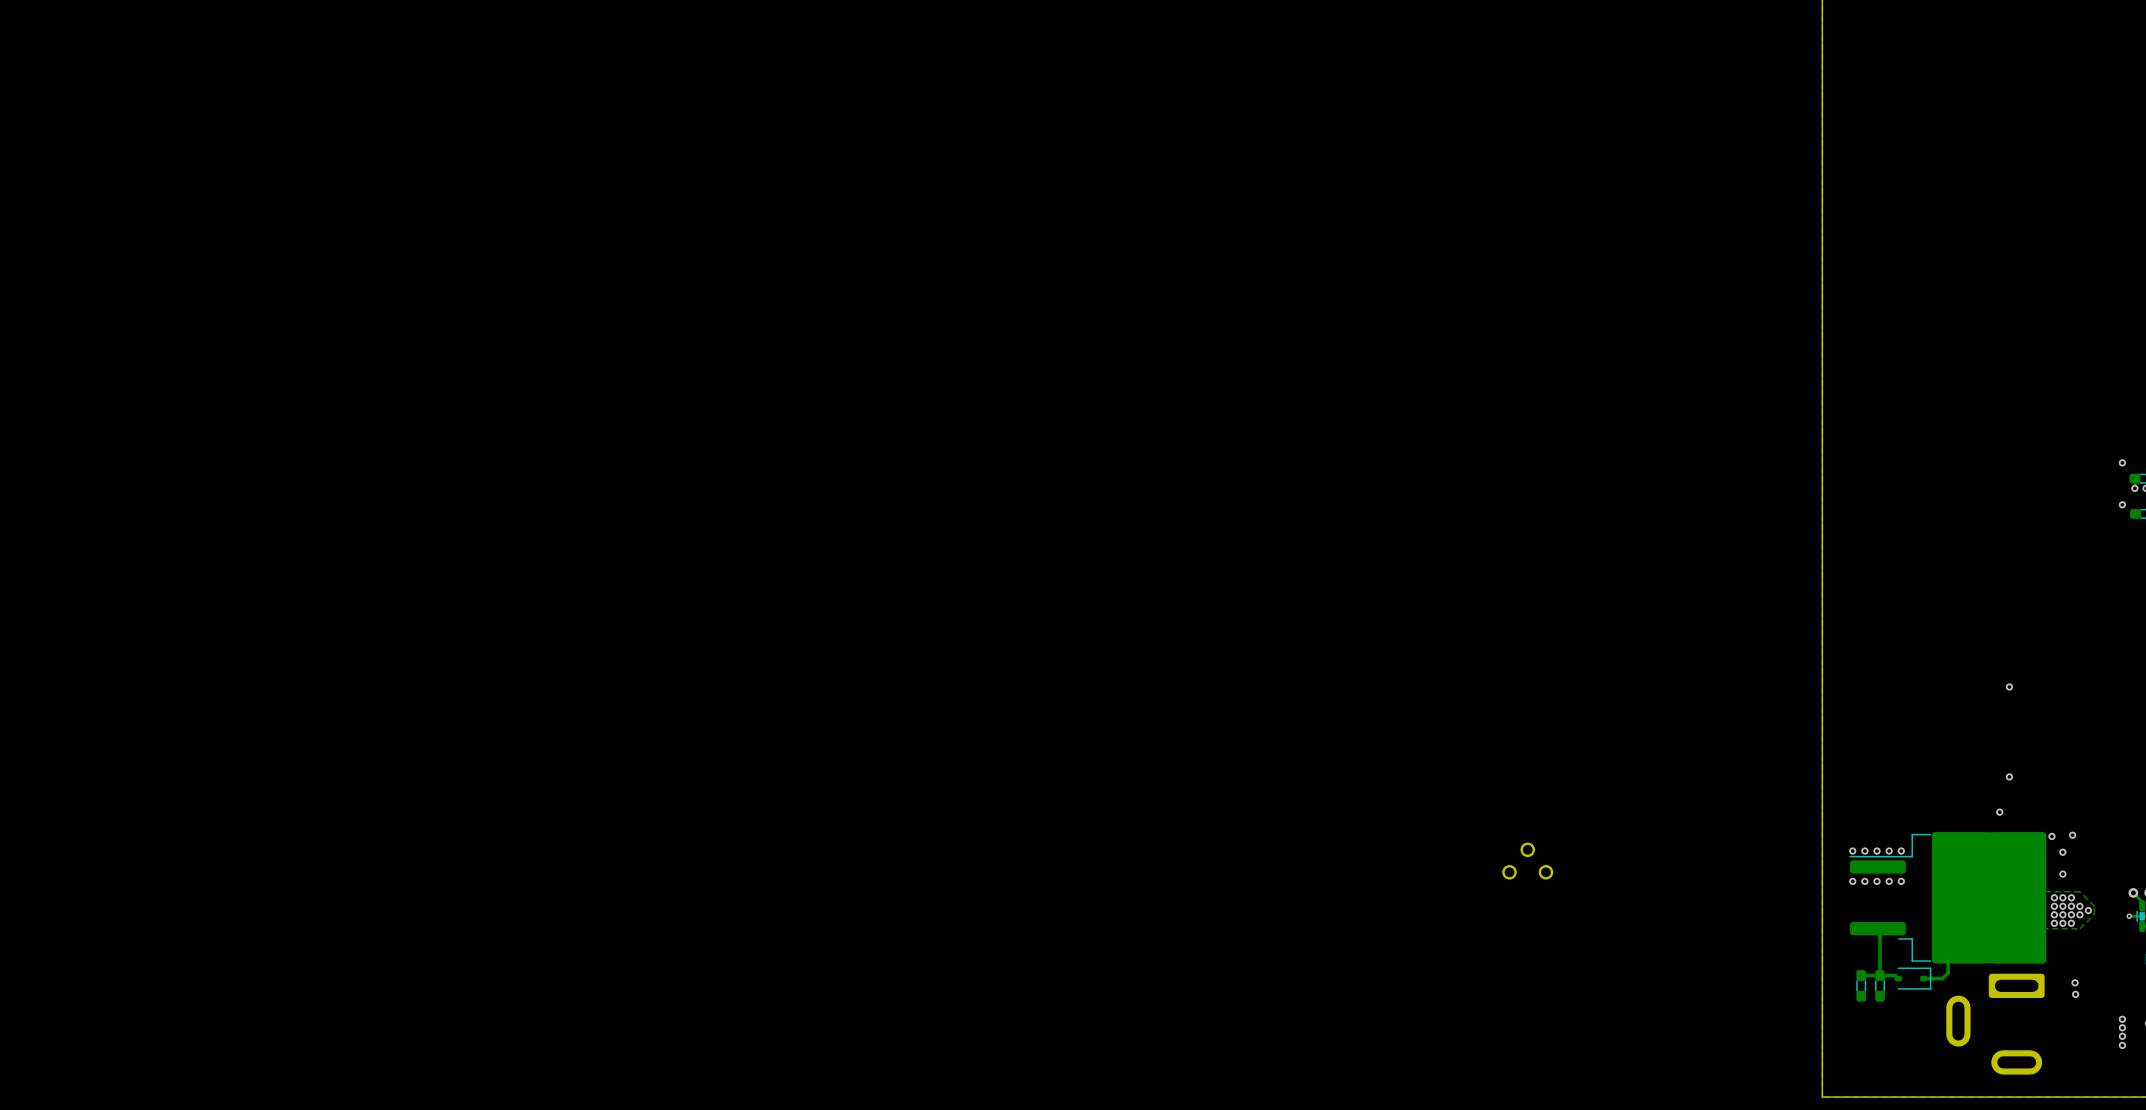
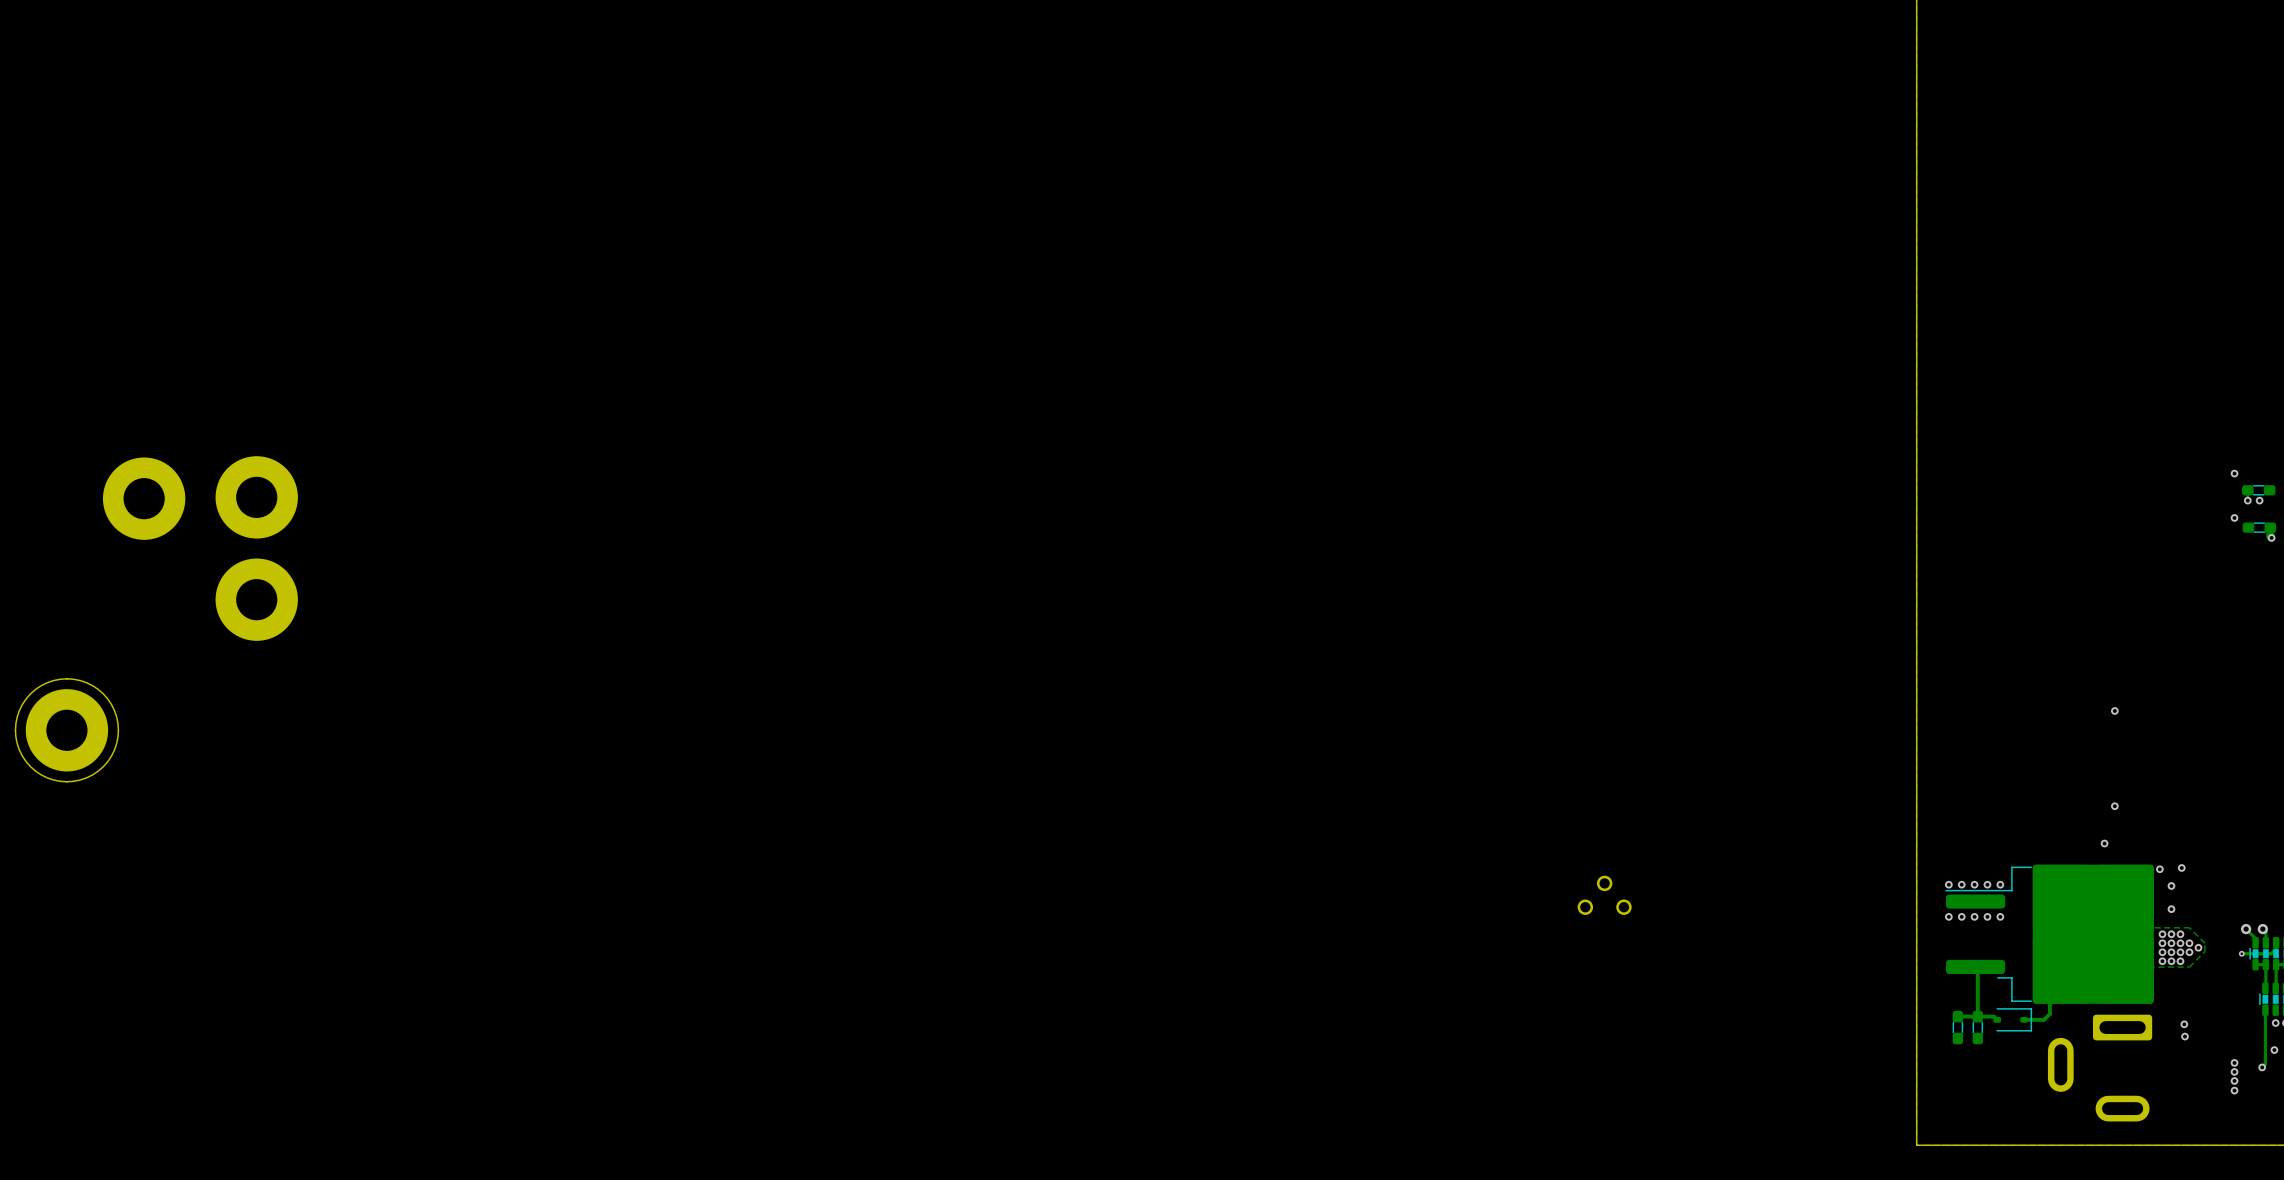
part: none -> (256, 497)
part: none -> (144, 498)
part: none -> (256, 599)
board edge: none -> (66, 678) (86, 682) (103, 693) (114, 710) (118, 730) (114, 749) (103, 766) (86, 777) (66, 781) (47, 777) (30, 766) (19, 749) (15, 730) (19, 710) (30, 693) (47, 682) (66, 678)
part: none -> (66, 730)

